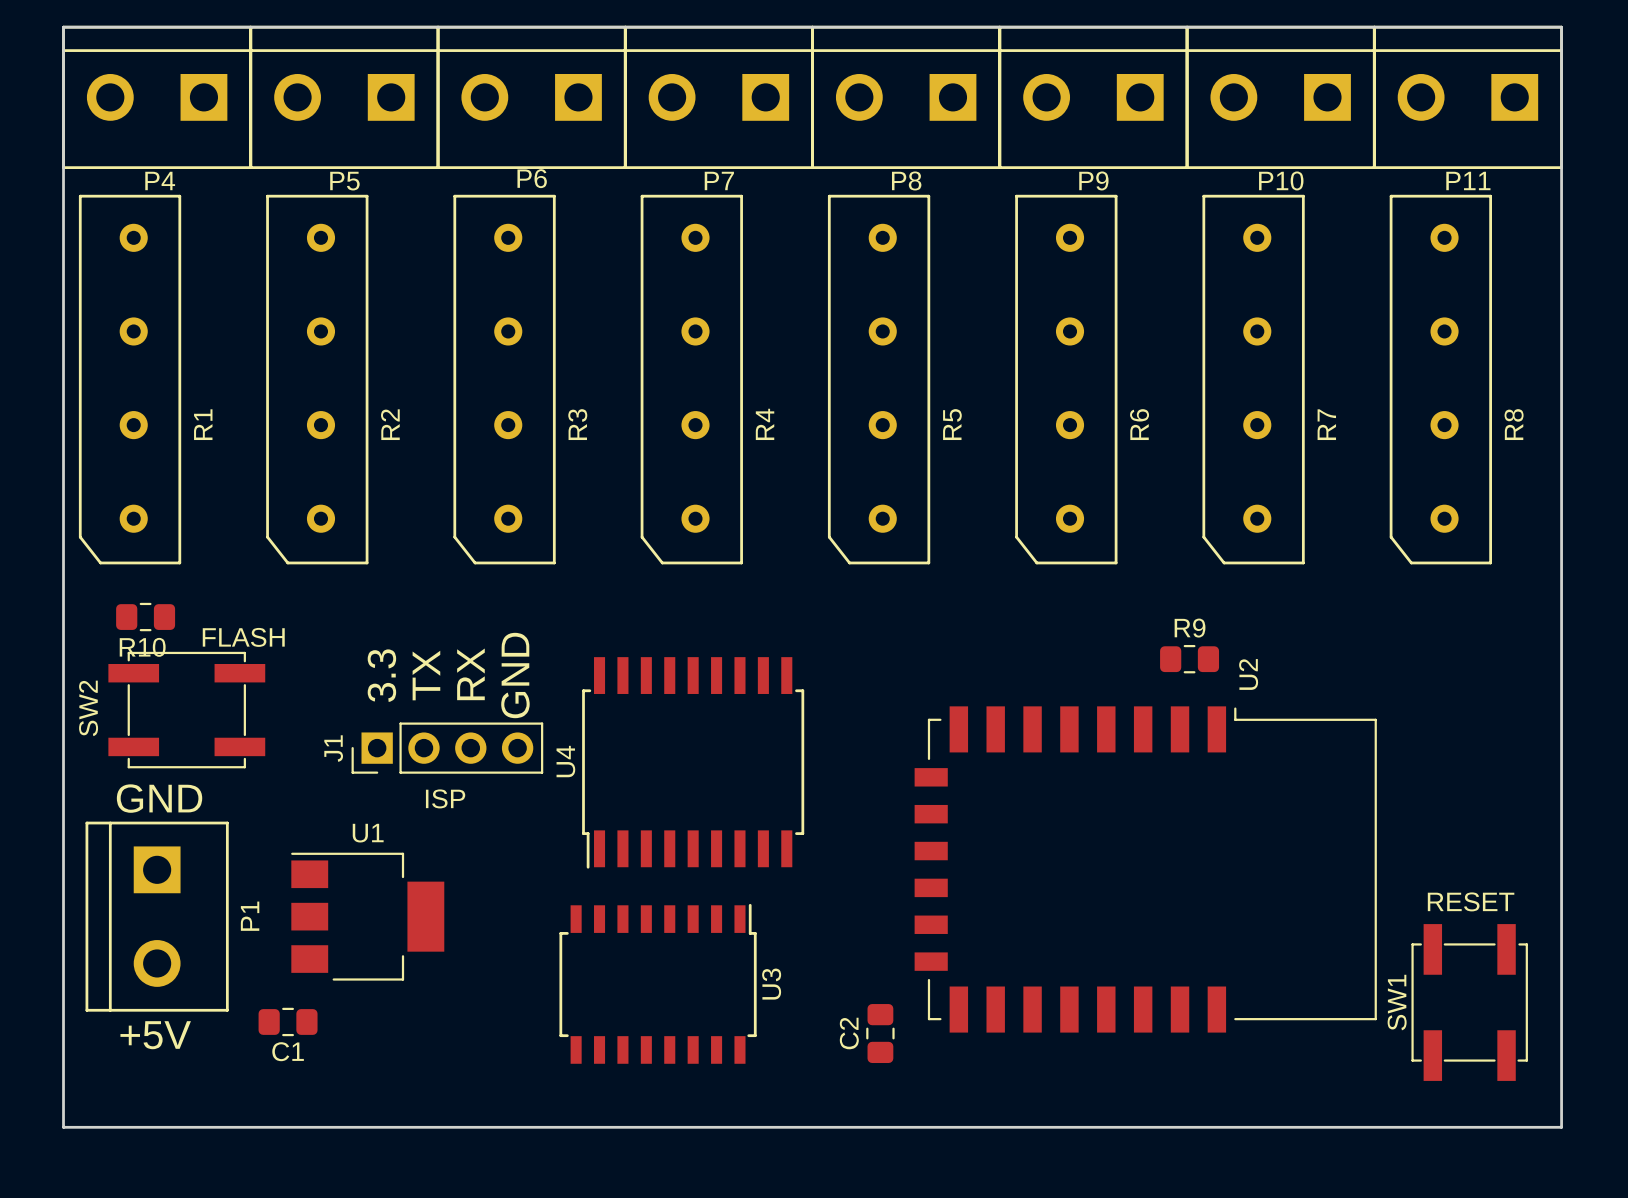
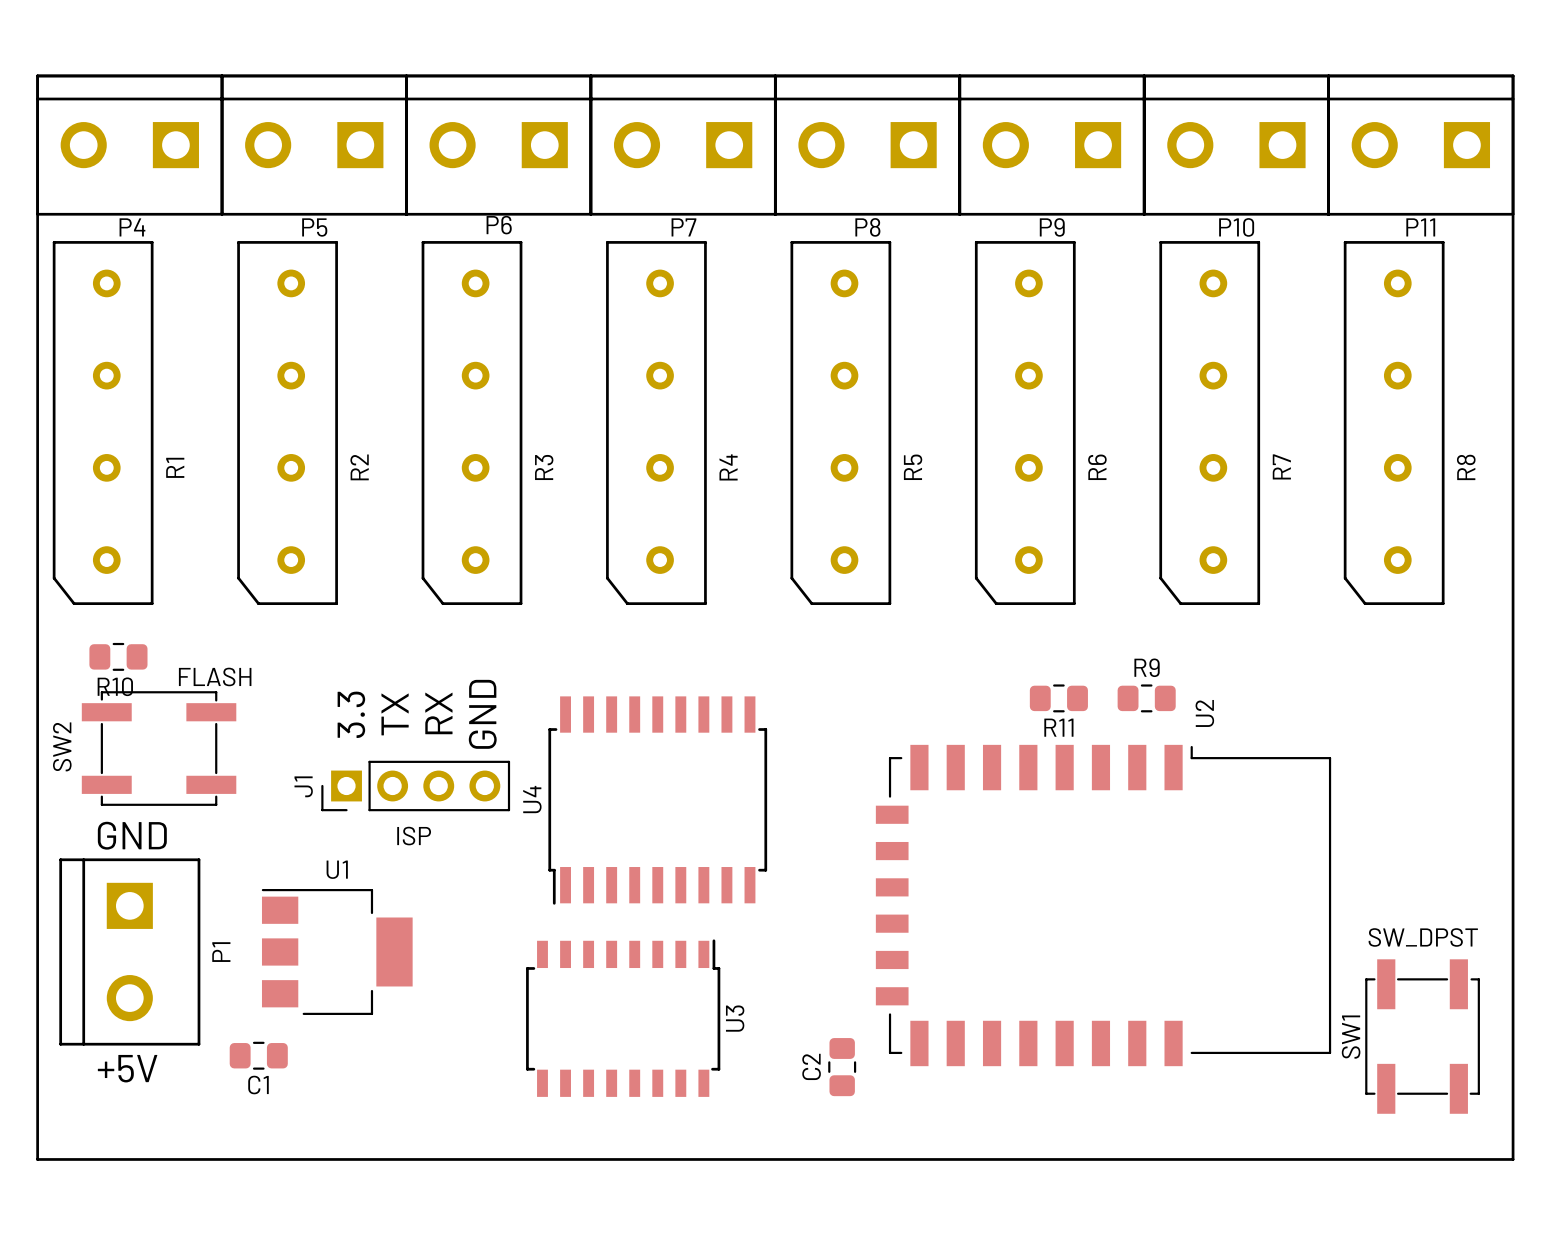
R11: none -> (1058, 698)
SW1 value: RESET (1471, 901) -> SW_DPST (1423, 937)

